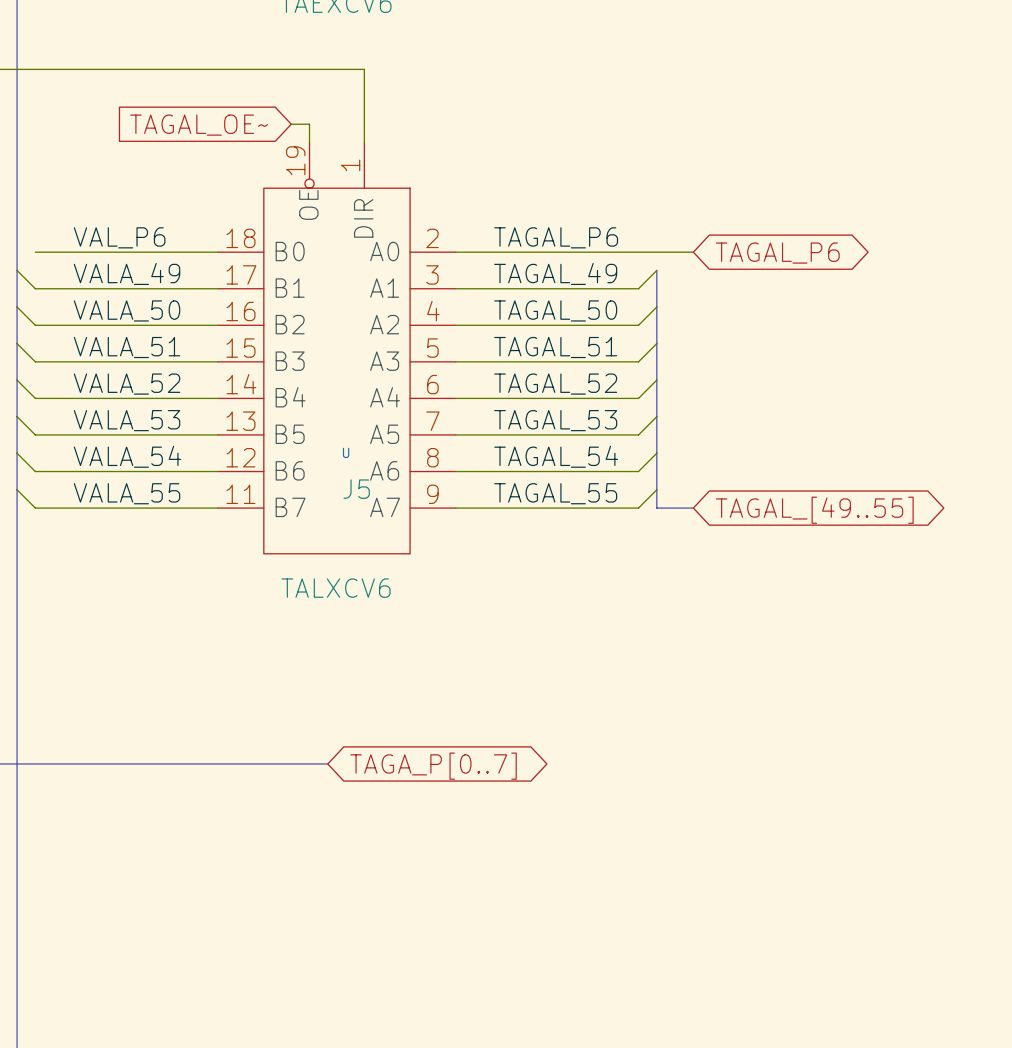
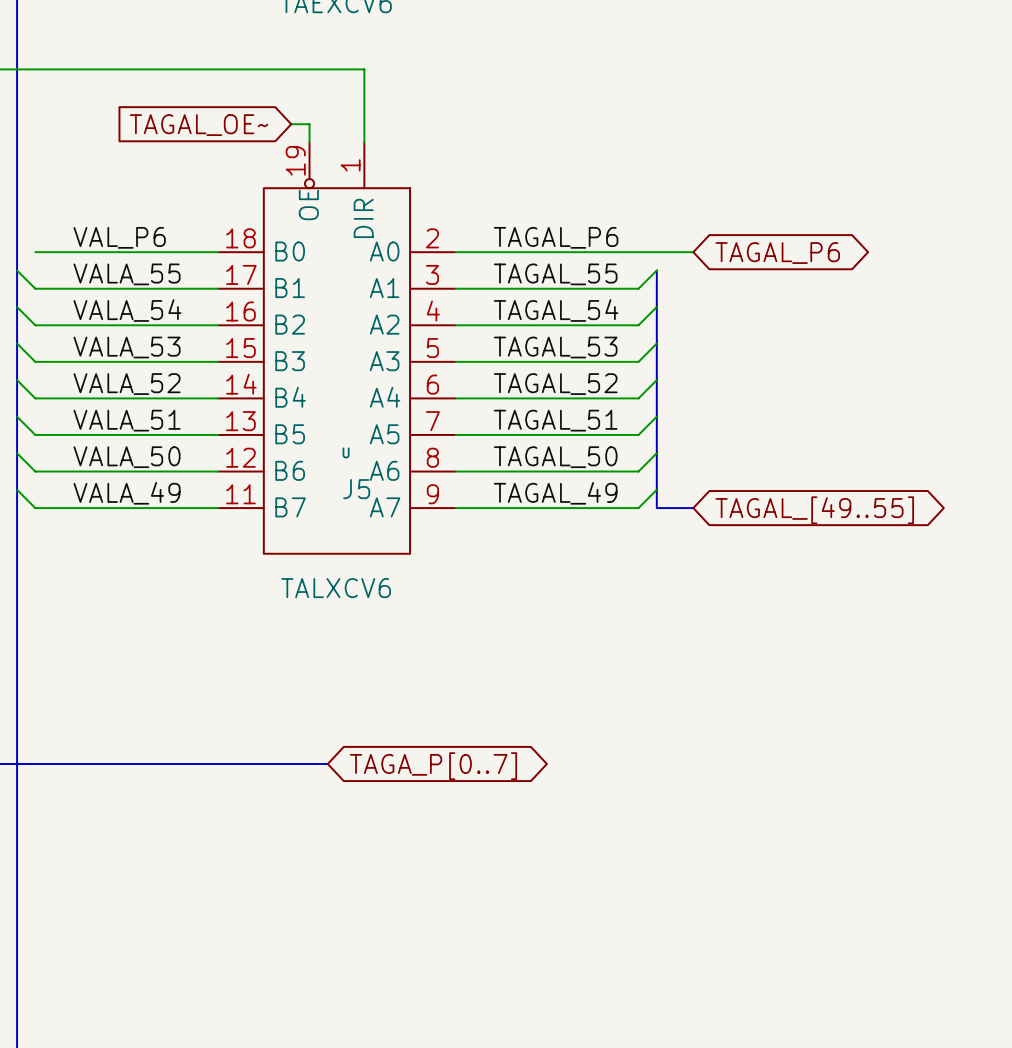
label: VALA_49 (127, 273) -> VALA_55 (127, 274)
label: TAGAL_49 (555, 273) -> TAGAL_55 (555, 274)
label: VALA_50 (127, 310) -> VALA_54 (127, 310)
label: TAGAL_50 (555, 310) -> TAGAL_54 (556, 310)
label: VALA_51 (127, 347) -> VALA_53 (127, 347)
label: TAGAL_51 (555, 347) -> TAGAL_53 (555, 347)
label: VALA_53 (127, 420) -> VALA_51 (127, 420)
label: TAGAL_53 (555, 420) -> TAGAL_51 (555, 420)
label: VALA_54 (127, 456) -> VALA_50 (127, 457)
label: TAGAL_54 (556, 456) -> TAGAL_50 (555, 457)
label: VALA_55 (127, 493) -> VALA_49 (127, 493)
label: TAGAL_55 (555, 493) -> TAGAL_49 (555, 493)

